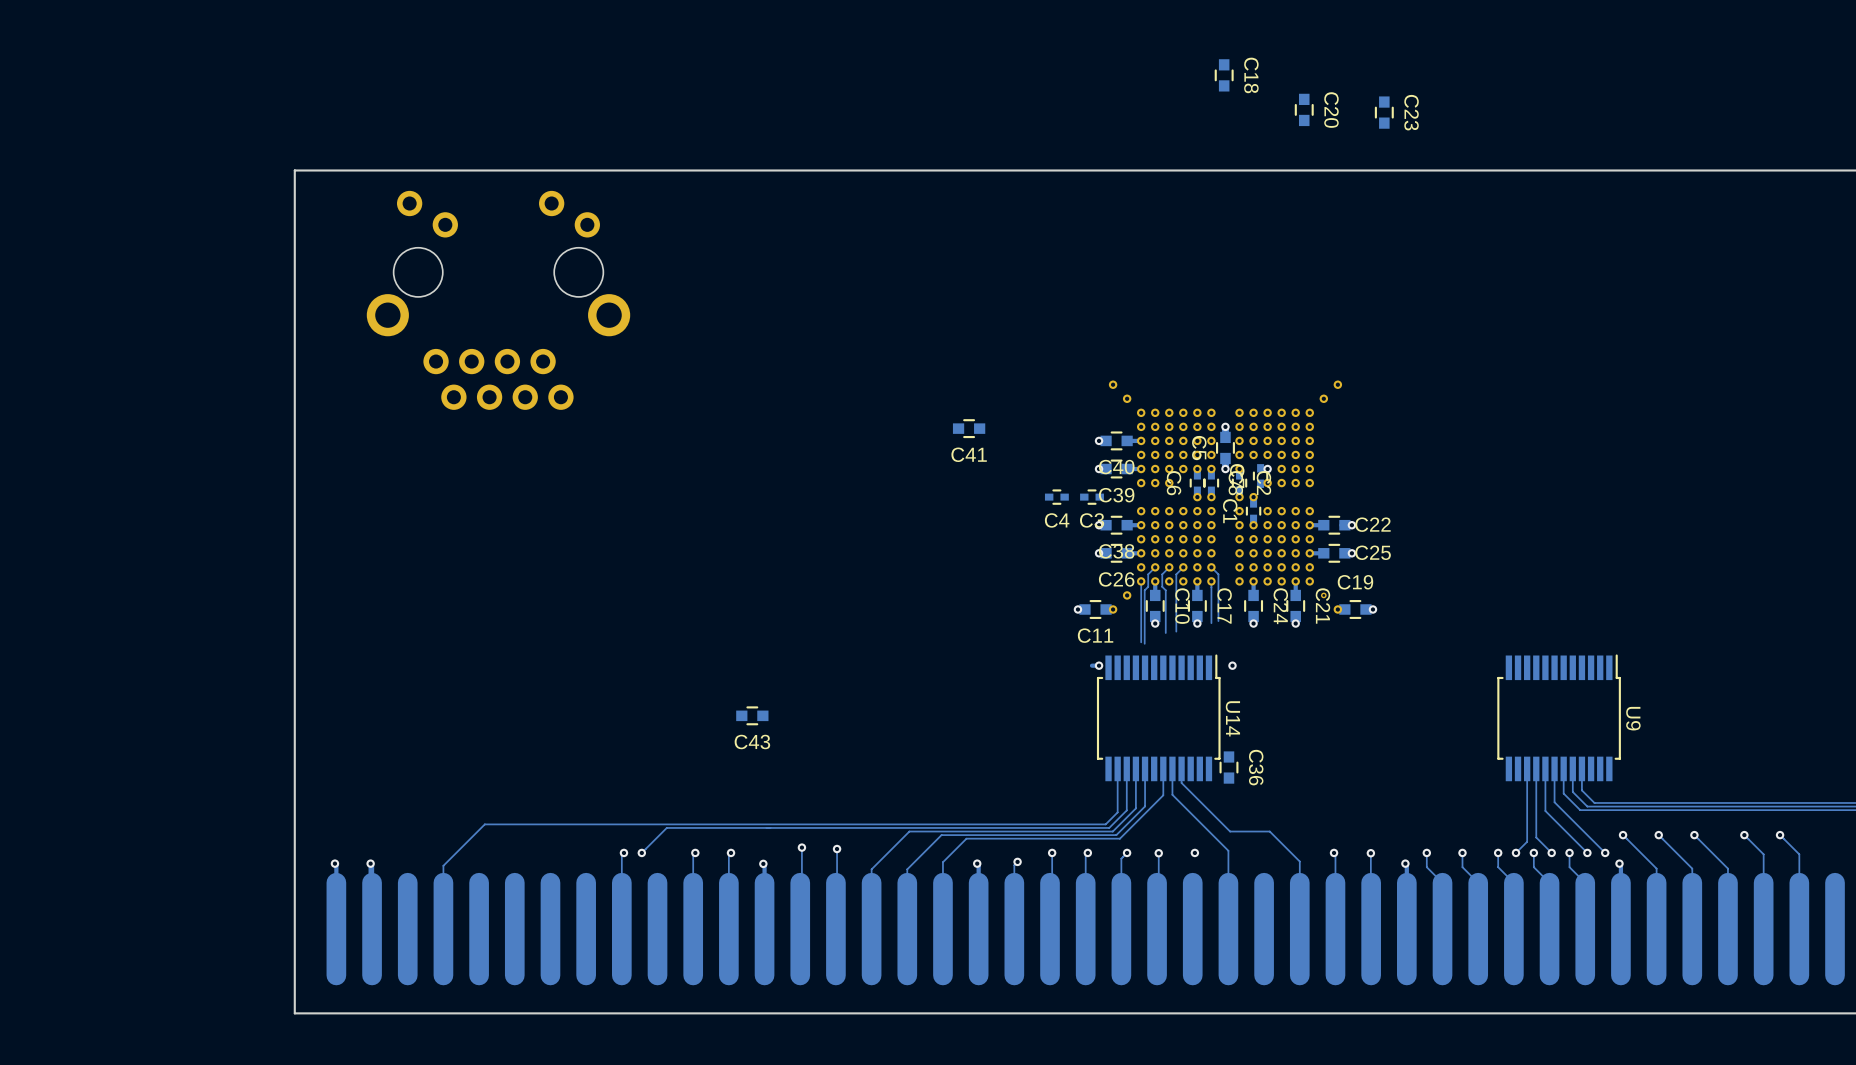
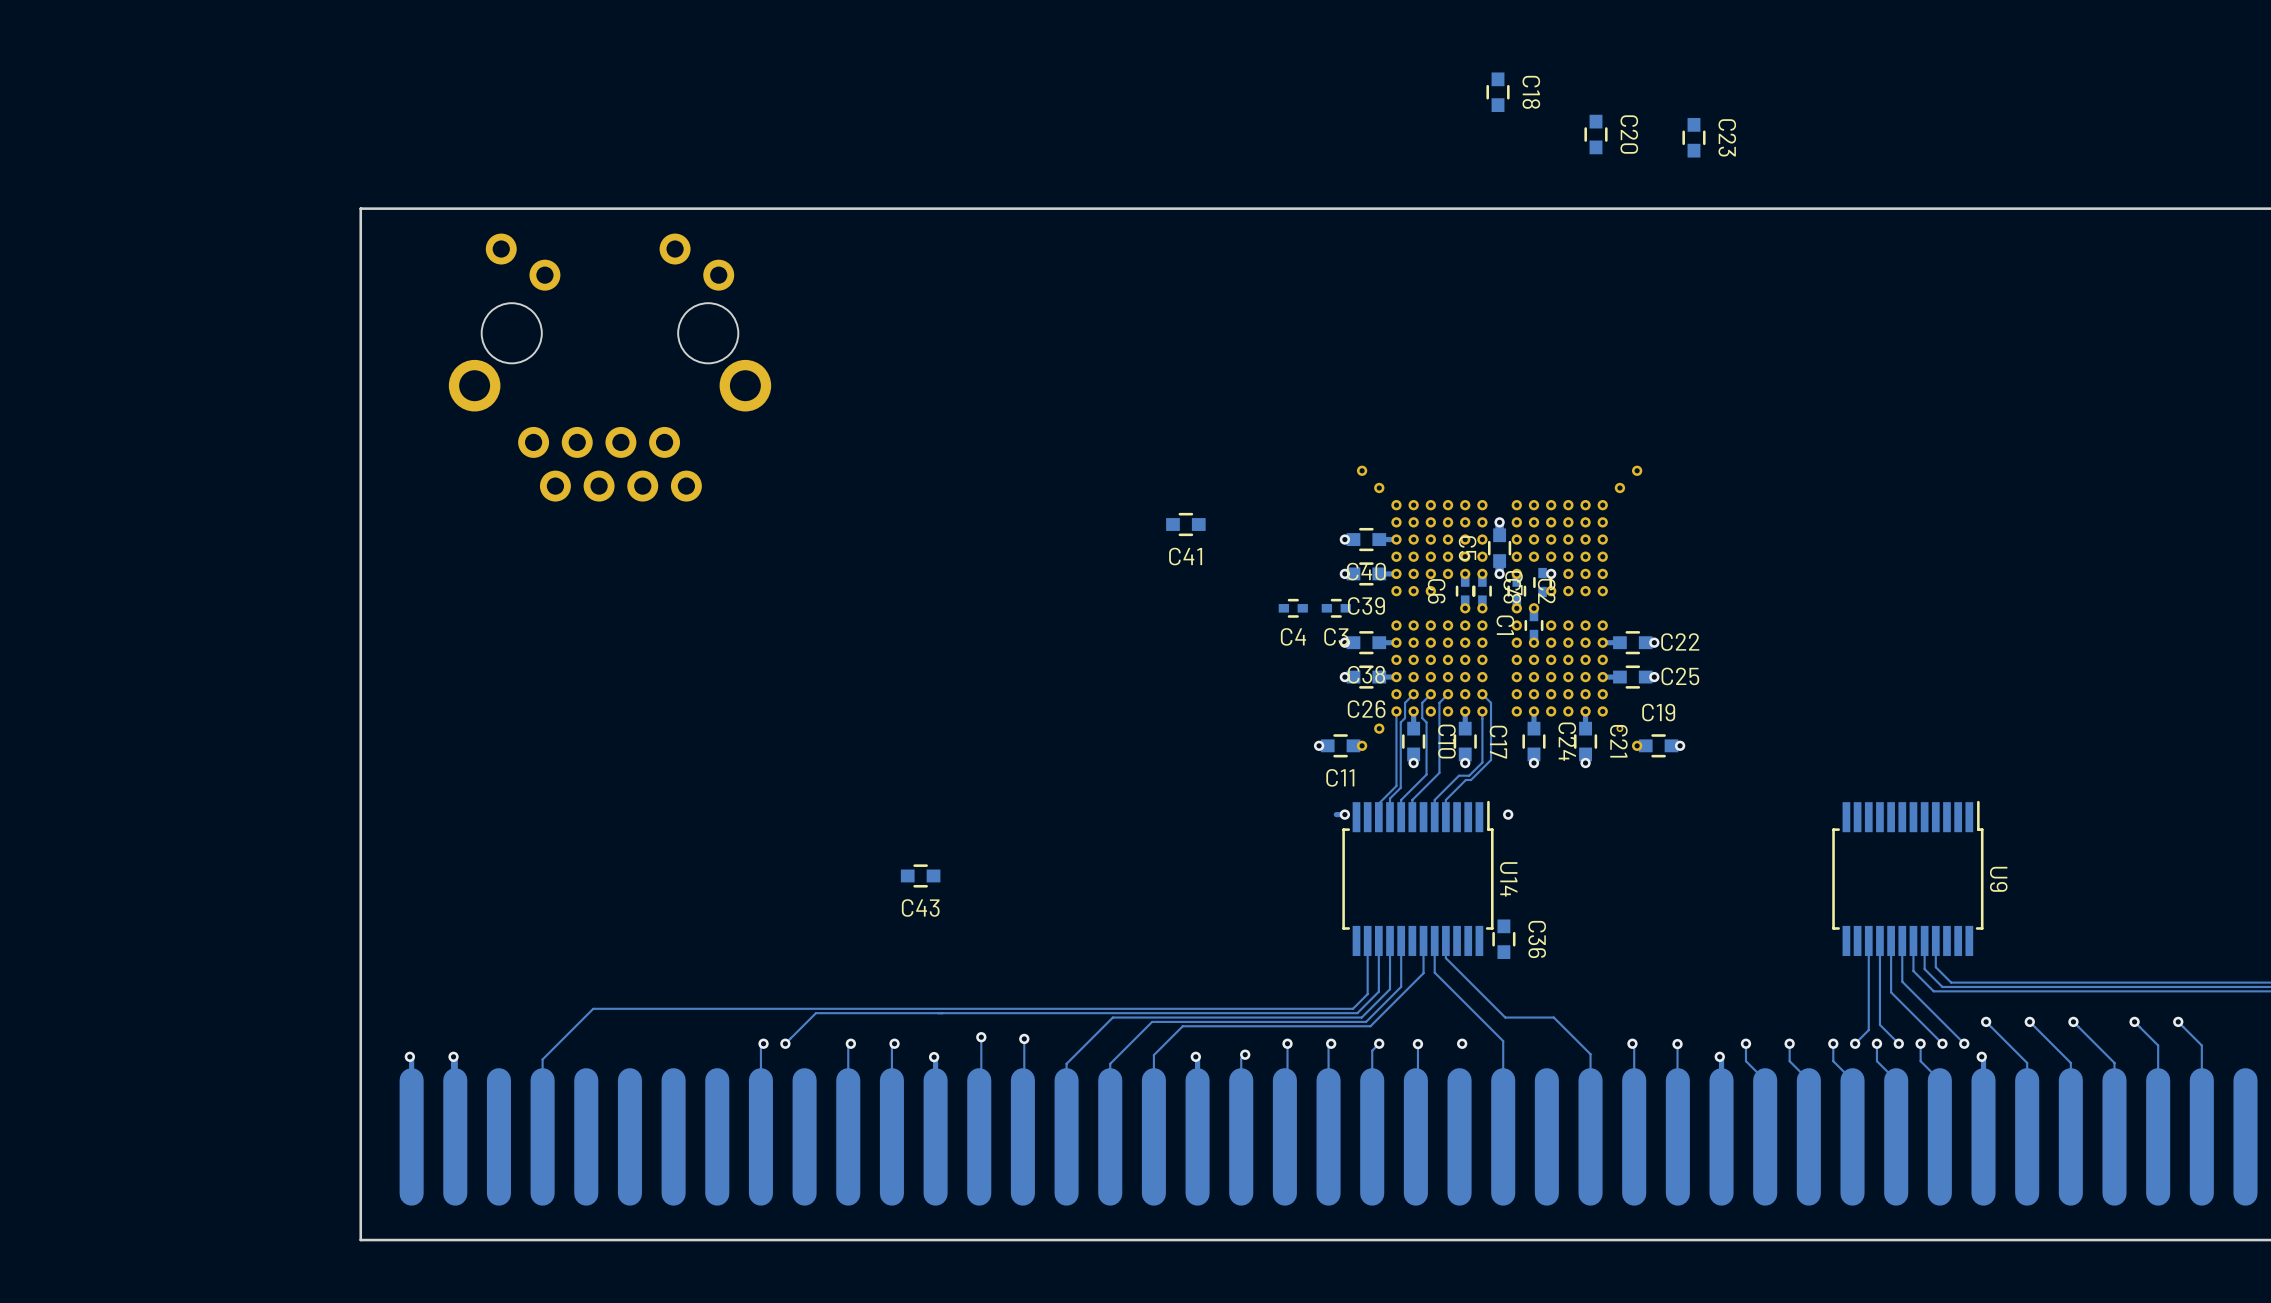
track: none -> (1491, 760) (1471, 779) (1465, 779) (1445, 799) (1445, 817)
track: none -> (1482, 762) (1469, 775) (1458, 775) (1434, 799) (1434, 817)
track: none -> (1439, 772) (1412, 799) (1412, 817)
track: none -> (1426, 774) (1401, 799) (1401, 817)
track: none -> (1396, 786) (1378, 803) (1378, 817)
track: none -> (1400, 787) (1390, 798) (1390, 817)

